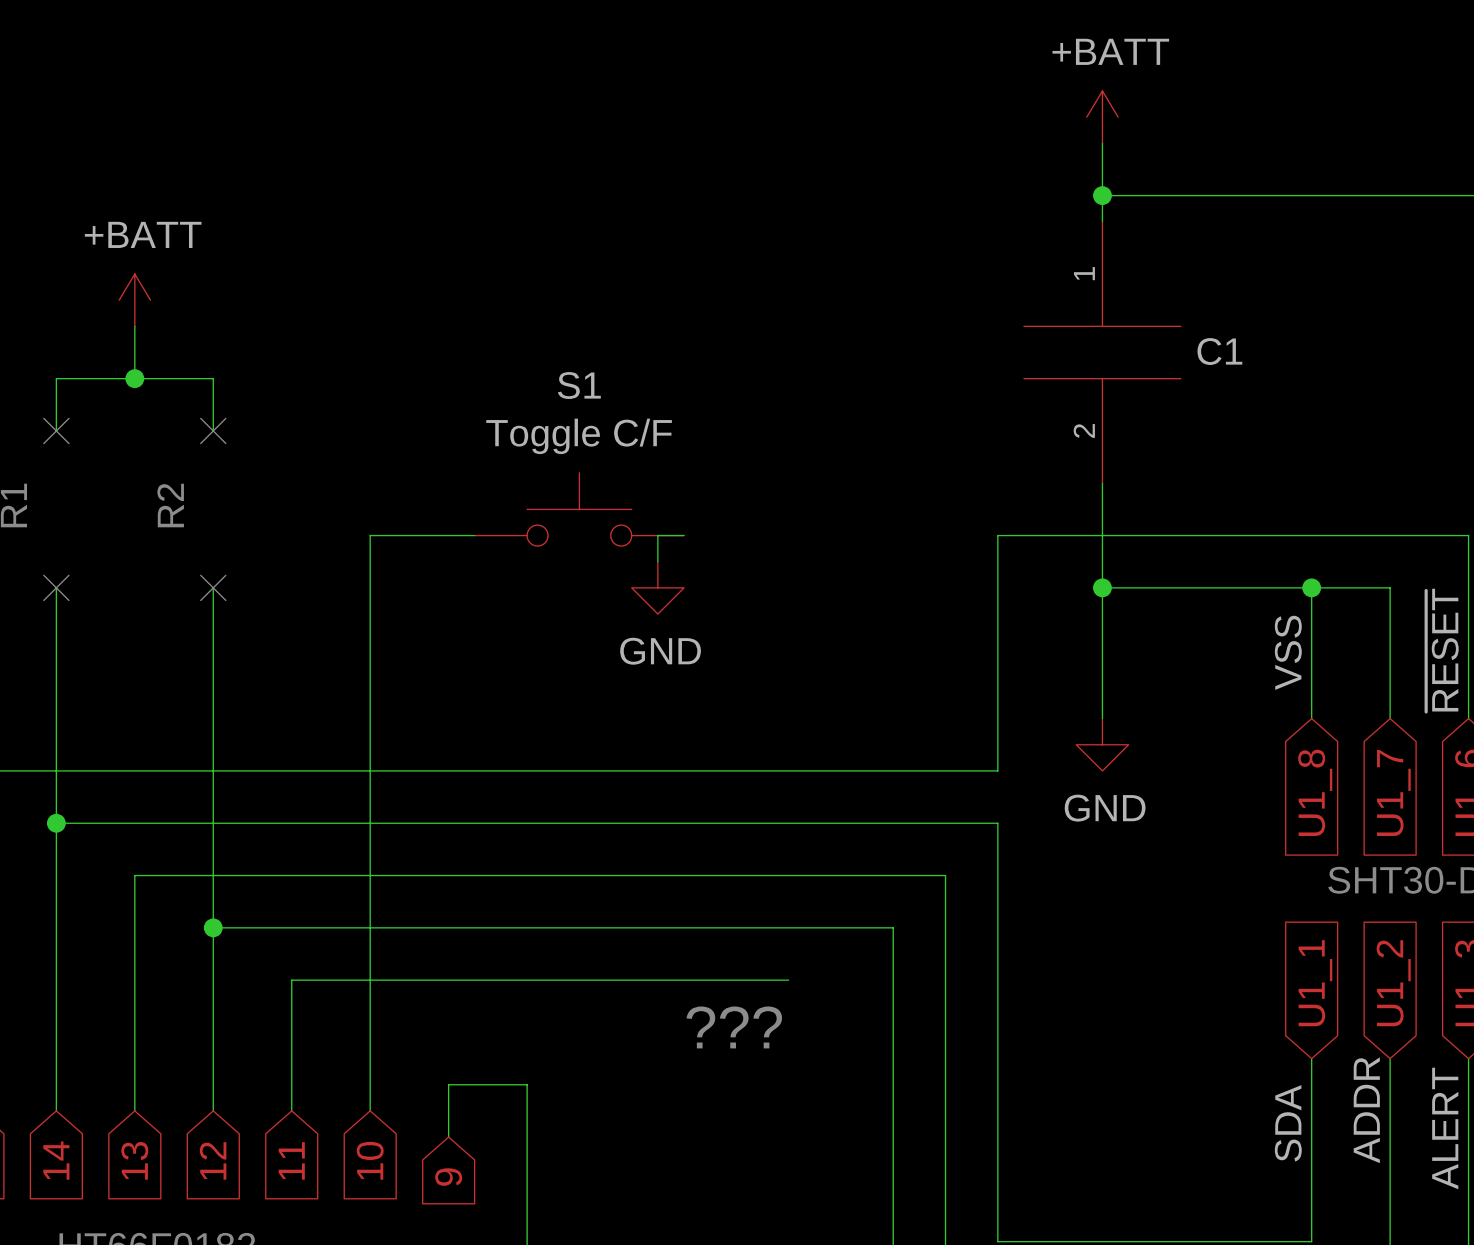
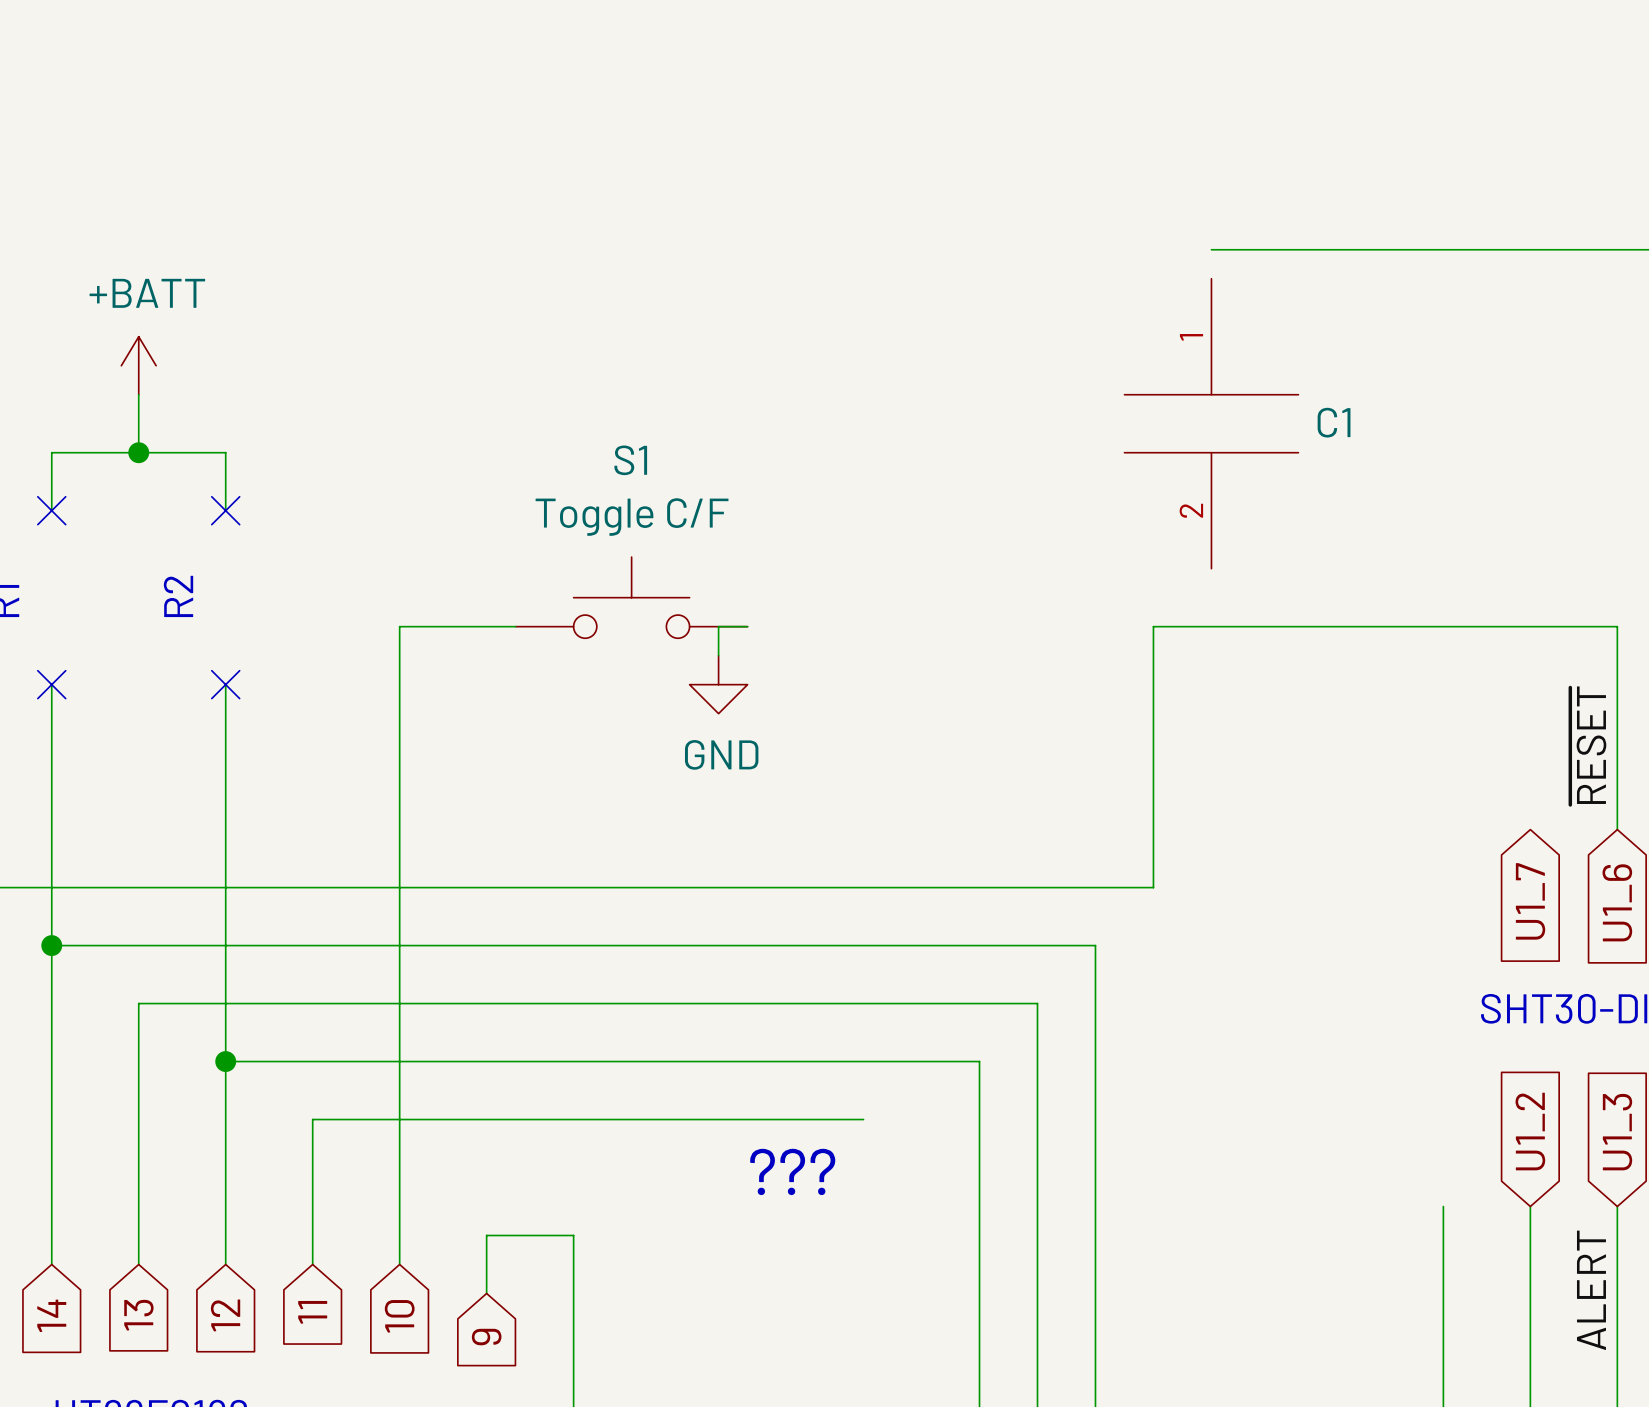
power symbol: +BATT (1102, 117) -> none
wire: (1102, 143) (1102, 221) -> none
junction: (1102, 195) -> none
wire: (1102, 483) (1102, 718) -> none
wire: (1050, 535) (997, 535) (997, 770) -> (1153, 626) (1153, 887) (1095, 887)
wire: (1102, 587) (1390, 587) (1390, 718) -> none
junction: (1102, 587) -> none
wire: (1311, 587) (1311, 718) -> none
junction: (1311, 587) -> none
label: VSS (1288, 652) -> none
power symbol: GND (1102, 744) -> none
global label: U1_8 (1315, 792) -> none
global label: U1_1 (1315, 983) -> none
label: ADDR (1366, 1110) -> none
label: SDA (1288, 1123) -> none

